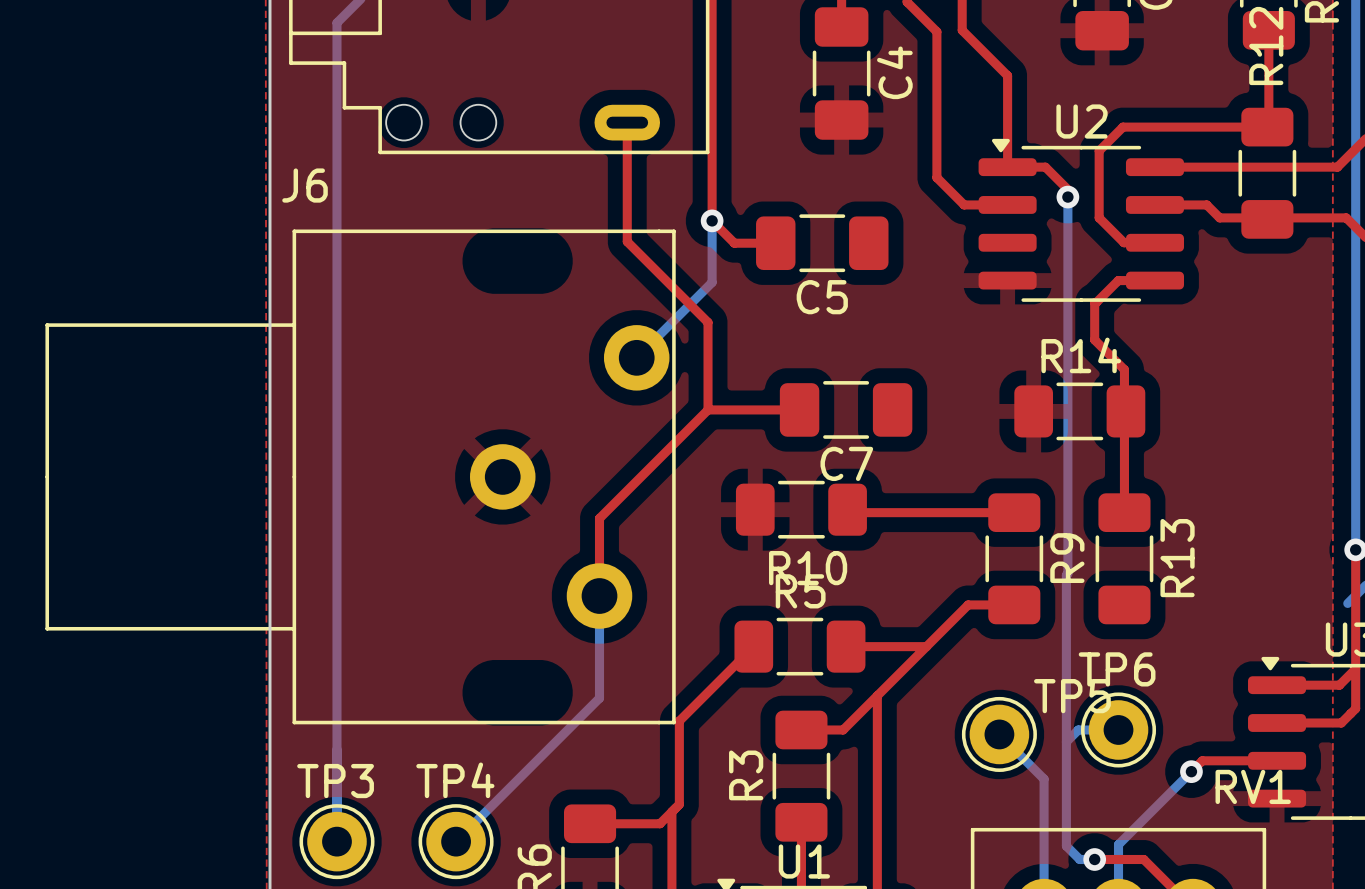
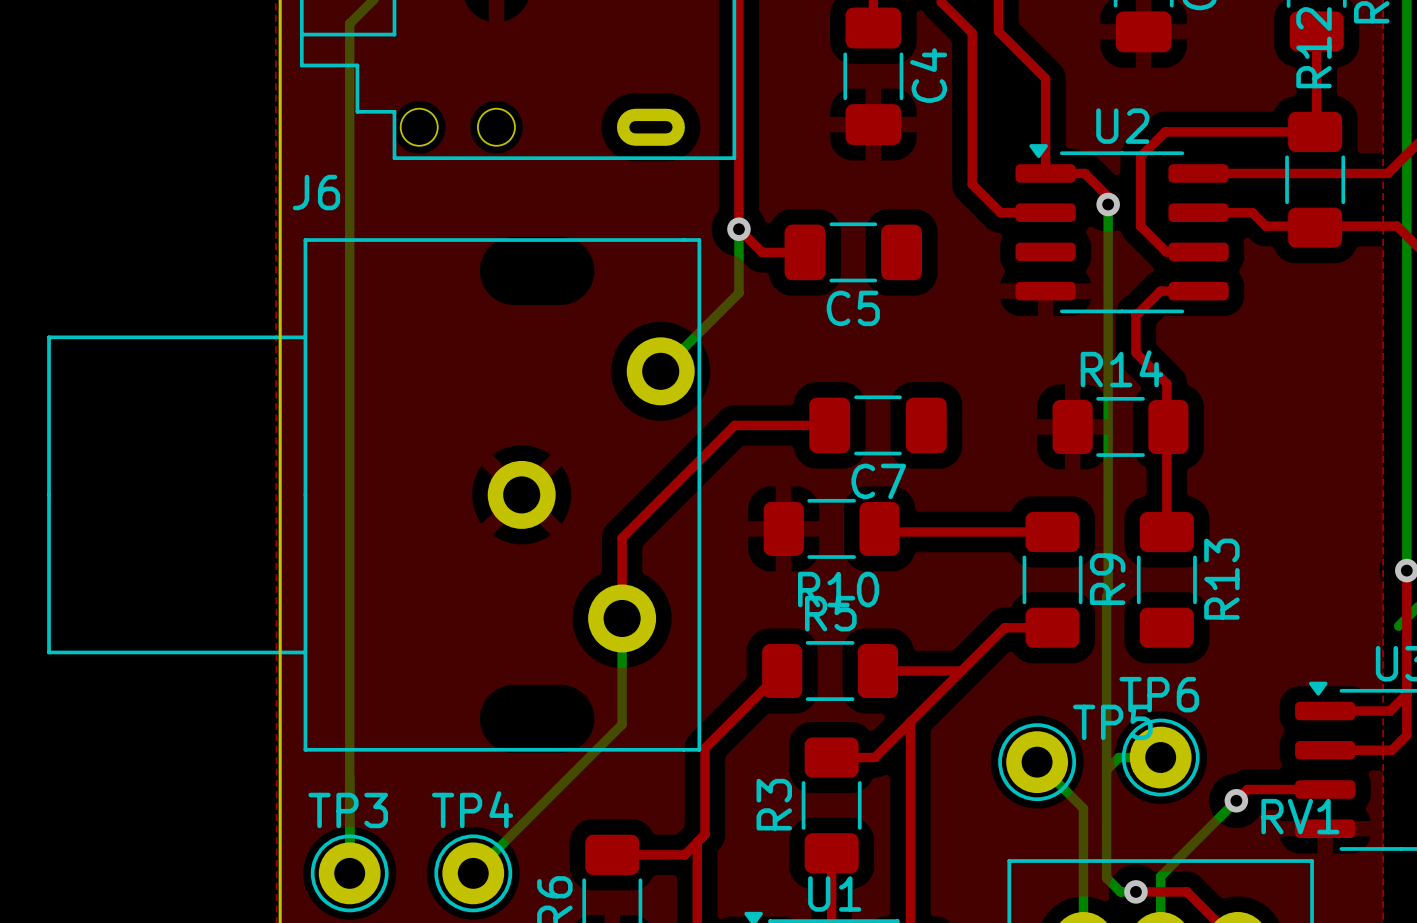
top track: (627, 122) (627, 241) (708, 322) (708, 409) -> none

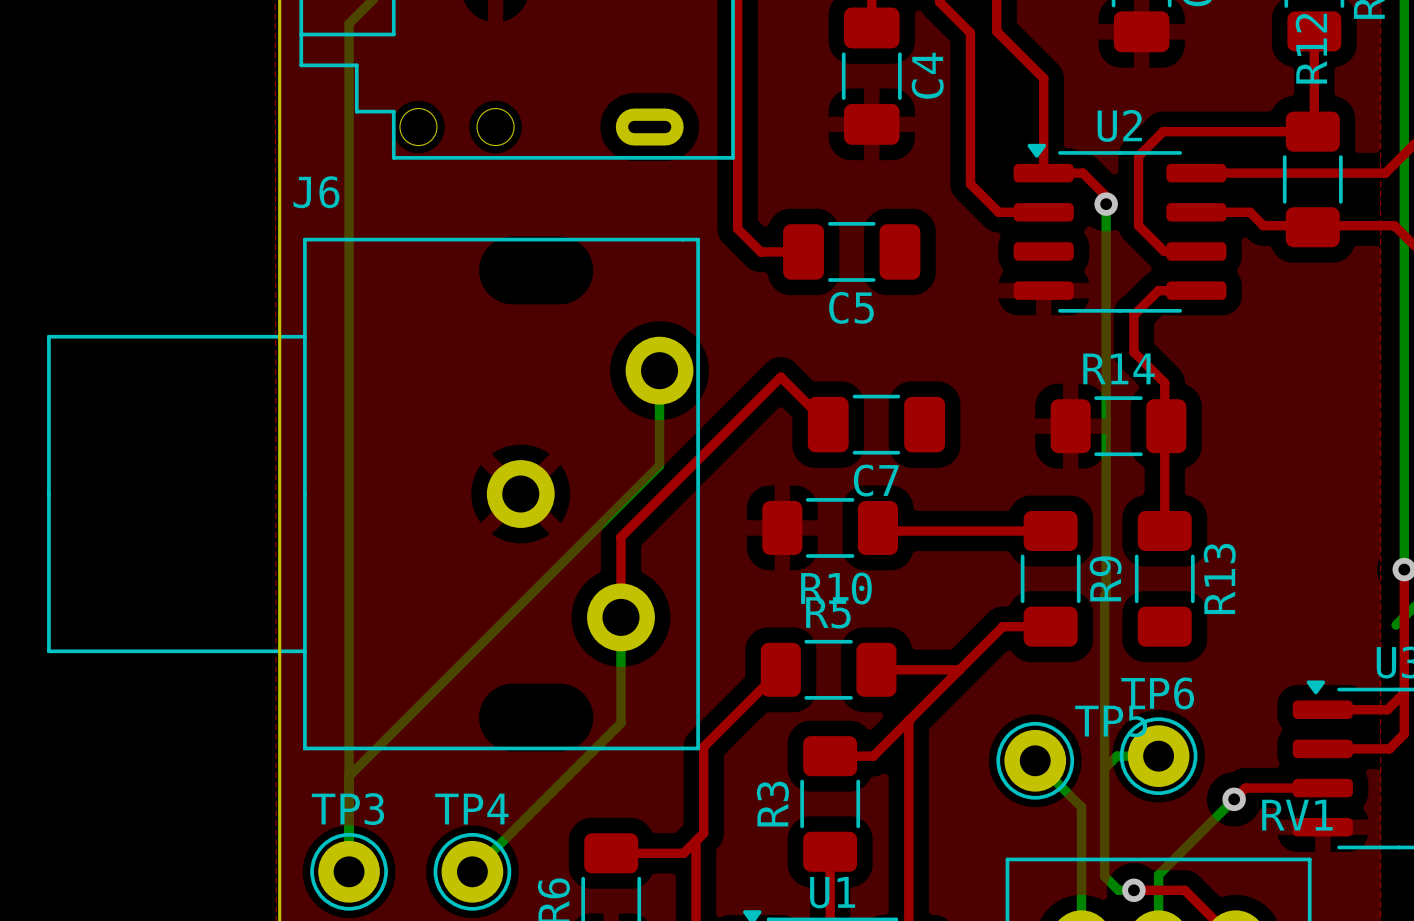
bottom track: (738, 229) (738, 293) (660, 371) -> (349, 776) (659, 465) (659, 370)
via: (738, 229) -> none
top track: (734, 425) (829, 425) -> (733, 424) (780, 377) (828, 424)

